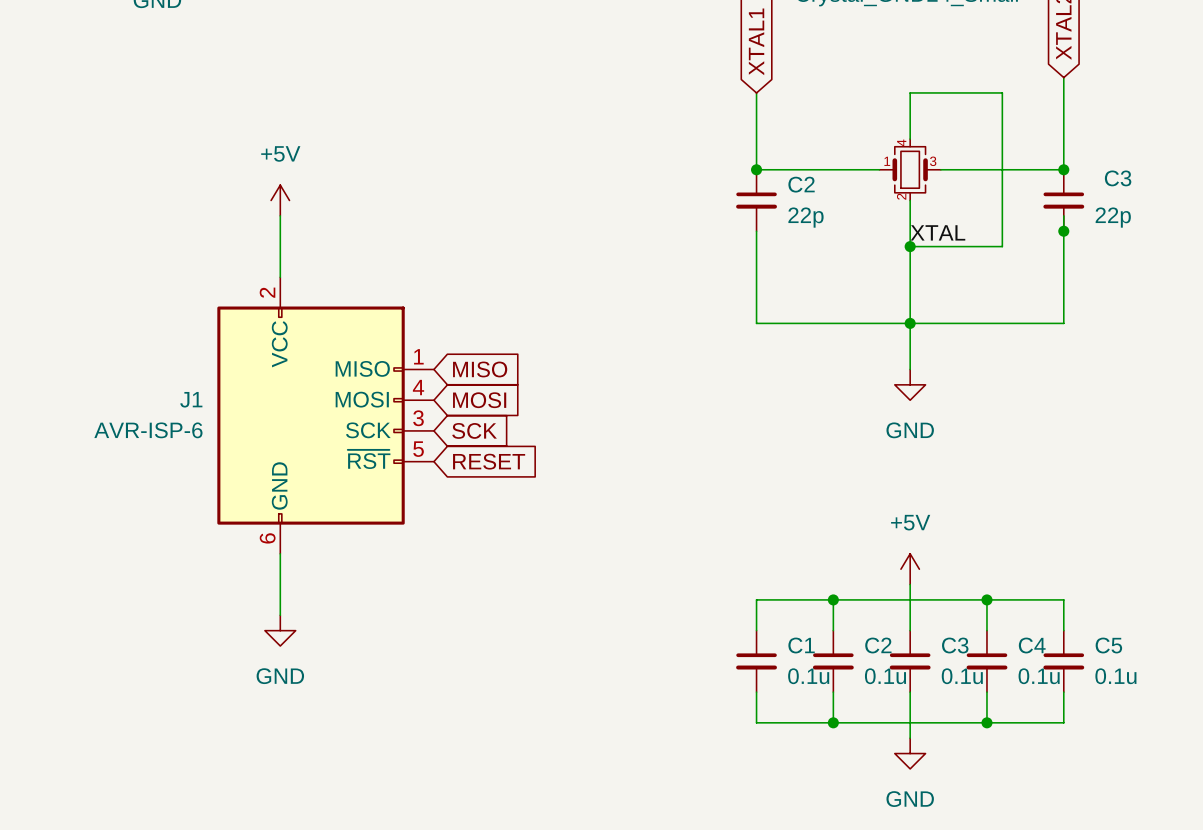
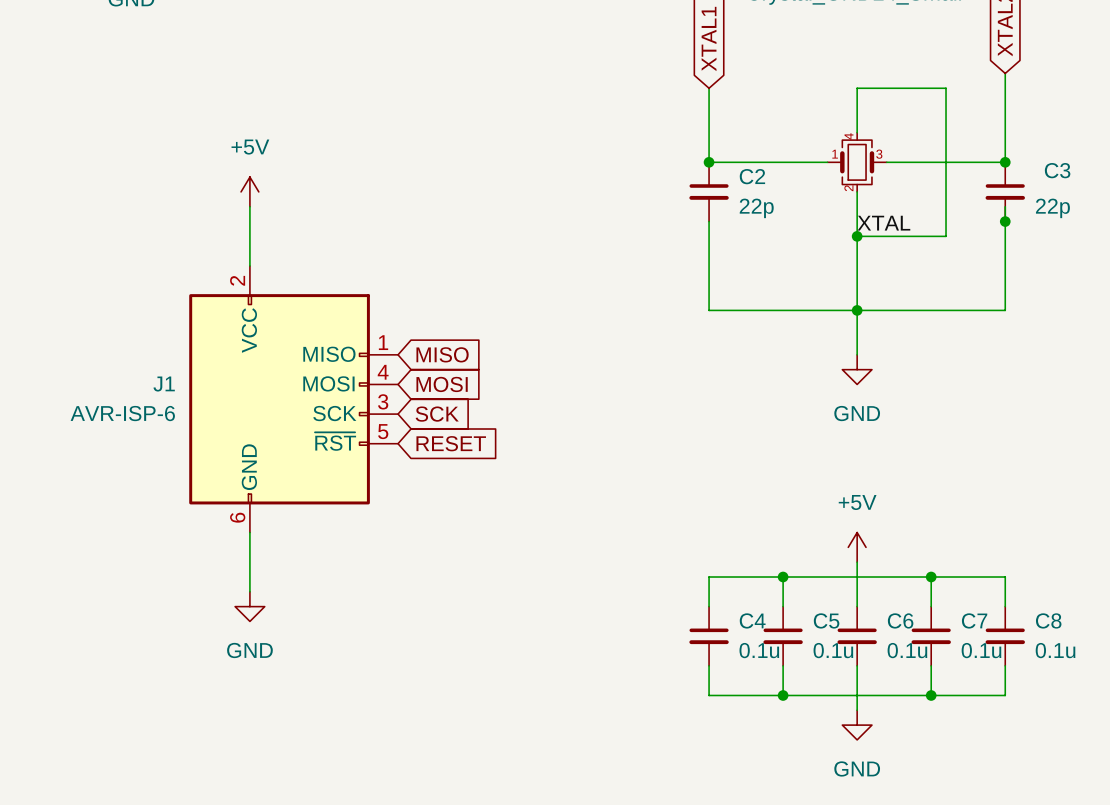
C1 name: C1 (801, 645) -> C4 (752, 620)
C2 name: C2 (878, 645) -> C5 (826, 620)
C3 name: C3 (955, 645) -> C6 (900, 620)
C4 name: C4 (1032, 645) -> C7 (974, 620)
C5 name: C5 (1108, 645) -> C8 (1048, 620)

